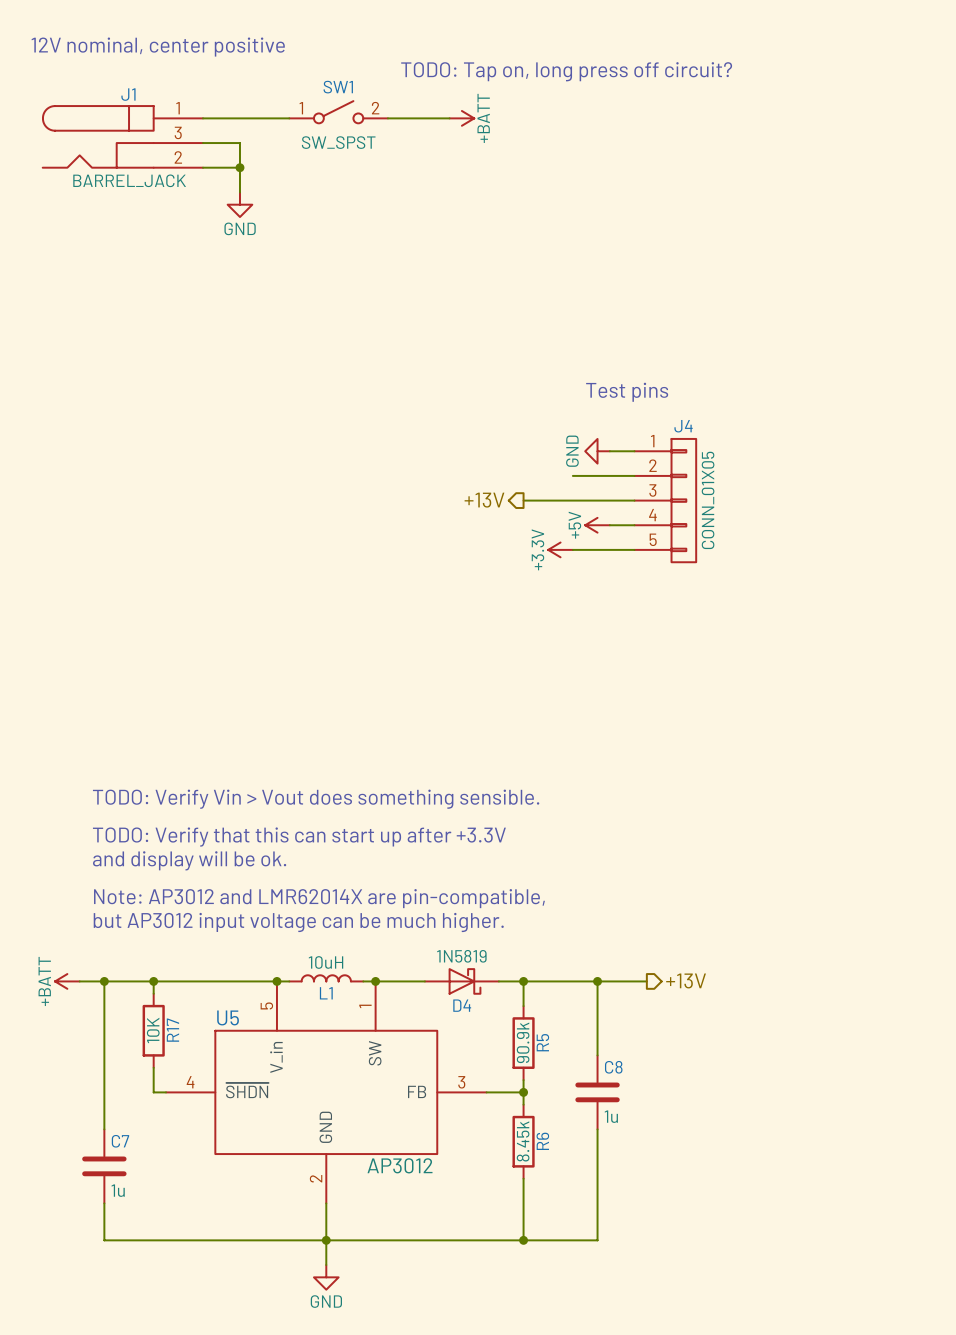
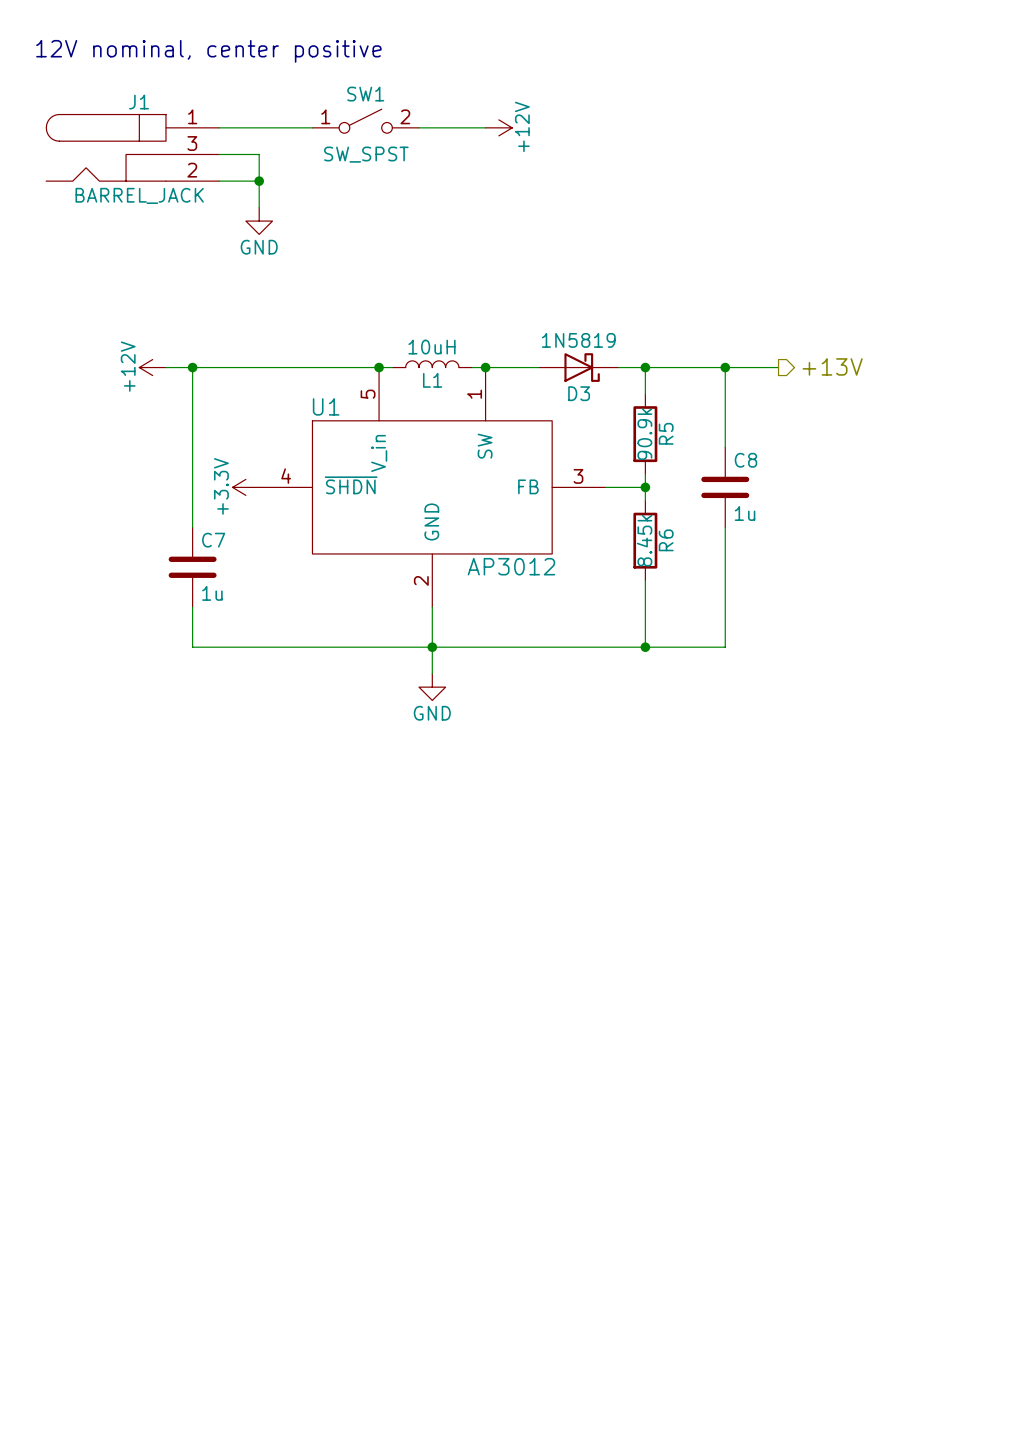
text: TODO: Tap on, long press off circuit? (566, 71) -> none
power symbol: +BATT (461, 118) -> +12V (498, 127)
hierarchical label: none -> +13V (832, 366)
power symbol: none -> +12V (152, 367)
wire: none -> (165, 367) (392, 367)
wire: none -> (192, 367) (192, 527)
junction: none -> (192, 367)
junction: none -> (379, 367)
junction: none -> (485, 367)
D3: none -> 1N5819 (578, 367)
wire: none -> (618, 367) (778, 367)
wire: none -> (645, 367) (645, 394)
junction: none -> (645, 367)
wire: none -> (725, 367) (725, 447)
junction: none -> (725, 367)
text: Test pins (627, 392) -> none
power symbol: none -> +3.3V (245, 487)
U1: none -> AP3012 (432, 487)
wire: none -> (605, 487) (645, 487)
junction: none -> (645, 487)
power symbol: GND (597, 451) -> none
wire: (609, 451) (634, 451) -> none
wire: (572, 475) (634, 475) -> (472, 367) (538, 367)
wire: none -> (725, 527) (725, 647) (192, 647) (192, 607)
hierarchical label: +13V (484, 500) -> none
wire: (523, 500) (634, 500) -> none
J4: CONN_01X05 (665, 500) -> none
power symbol: +5V (597, 525) -> none
wire: (609, 525) (634, 525) -> none
wire: none -> (645, 580) (645, 647)
power symbol: +3.3V (560, 549) -> none
wire: (572, 549) (634, 549) -> none
wire: none -> (432, 607) (432, 673)
junction: none -> (432, 647)
junction: none -> (645, 647)
power symbol: none -> GND (432, 687)
text: TODO: Verify Vin > Vout does something sensible. (316, 799) -> none
text: TODO: Verify that this can start up after +3.3V (299, 837) -> none
text: and display will be ok. (189, 860) -> none
text: Note: AP3012 and LMR62014X are pin-compatible, (319, 898) -> none
text: but AP3012 input voltage can be much higher. (298, 922) -> none
L1 position: (326, 978) -> (432, 364)
hierarchical label: +13V (686, 980) -> none
power symbol: +BATT (67, 981) -> none
wire: (79, 981) (289, 981) -> none
wire: (104, 981) (104, 1129) -> none
junction: (104, 981) -> none
wire: (153, 981) (153, 993) -> none
junction: (153, 981) -> none
junction: (276, 981) -> none
wire: (363, 981) (424, 981) -> none
junction: (375, 981) -> none
D4: 1N5819 (461, 981) -> none
wire: (498, 981) (646, 981) -> none
wire: (523, 981) (523, 1006) -> none
junction: (523, 981) -> none
wire: (597, 981) (597, 1055) -> none
junction: (597, 981) -> none
R17: 10K (153, 1030) -> none
R5 position: (523, 1043) -> (645, 434)
wire: (153, 1067) (153, 1092) (166, 1092) -> none
wire: (523, 1080) (523, 1104) -> none
U5: AP3012 (326, 1092) -> none
wire: (486, 1092) (523, 1092) -> none
junction: (523, 1092) -> none
C8 position: (597, 1092) -> (725, 487)
wire: (597, 1129) (597, 1240) (104, 1240) (104, 1203) -> none
R6 position: (523, 1141) -> (645, 540)
C7 position: (104, 1166) -> (192, 567)
wire: (523, 1178) (523, 1240) -> none
wire: (326, 1203) (326, 1265) -> none
junction: (326, 1240) -> none
junction: (523, 1240) -> none
power symbol: GND (326, 1277) -> none

